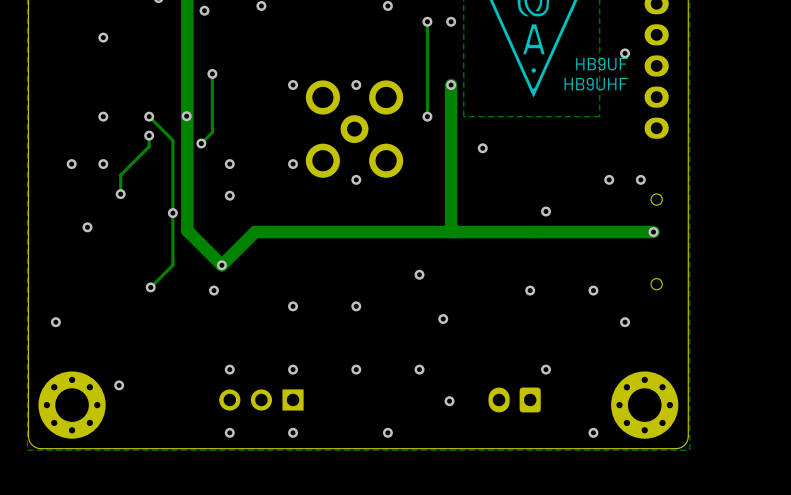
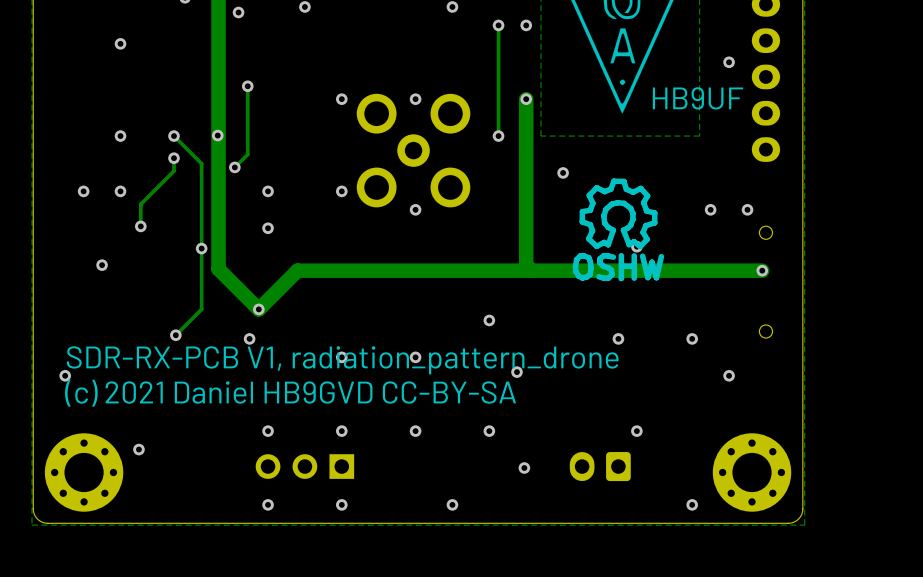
text: HB9UF (601, 64) -> none
text: HB9UHF (596, 84) -> HB9UF (697, 98)
drawing: none -> [572, 178, 665, 282]
text: none -> SDR-RX-PCB V1, radiation_pattern_drone (342, 360)
text: none -> (c) 2021 Daniel HB9GVD CC-BY-SA (290, 393)

